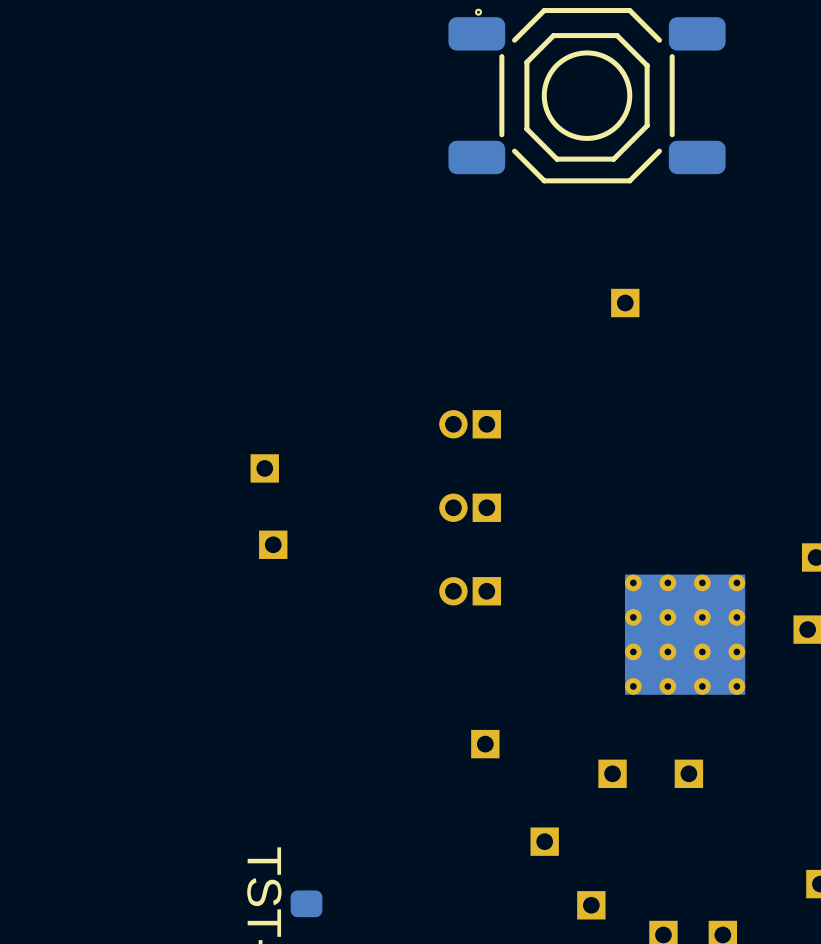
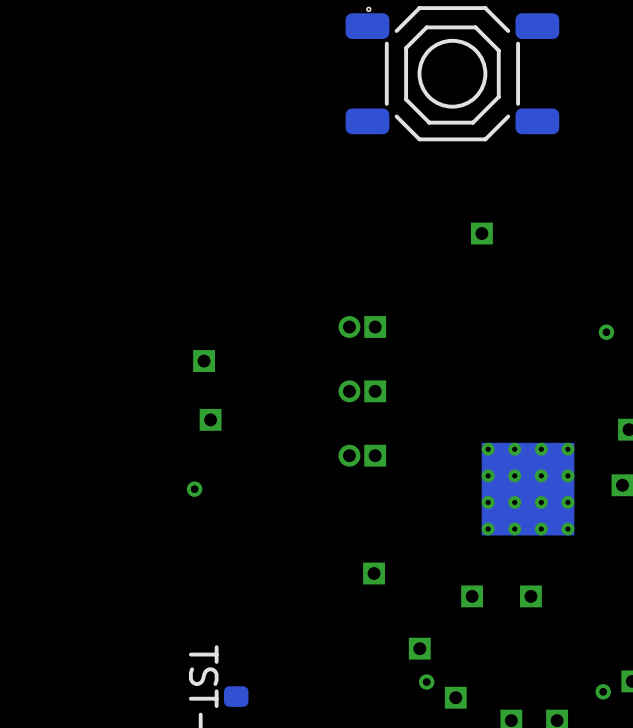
via: none -> (606, 332)
via: none -> (194, 489)
via: none -> (426, 682)
via: none -> (603, 691)

